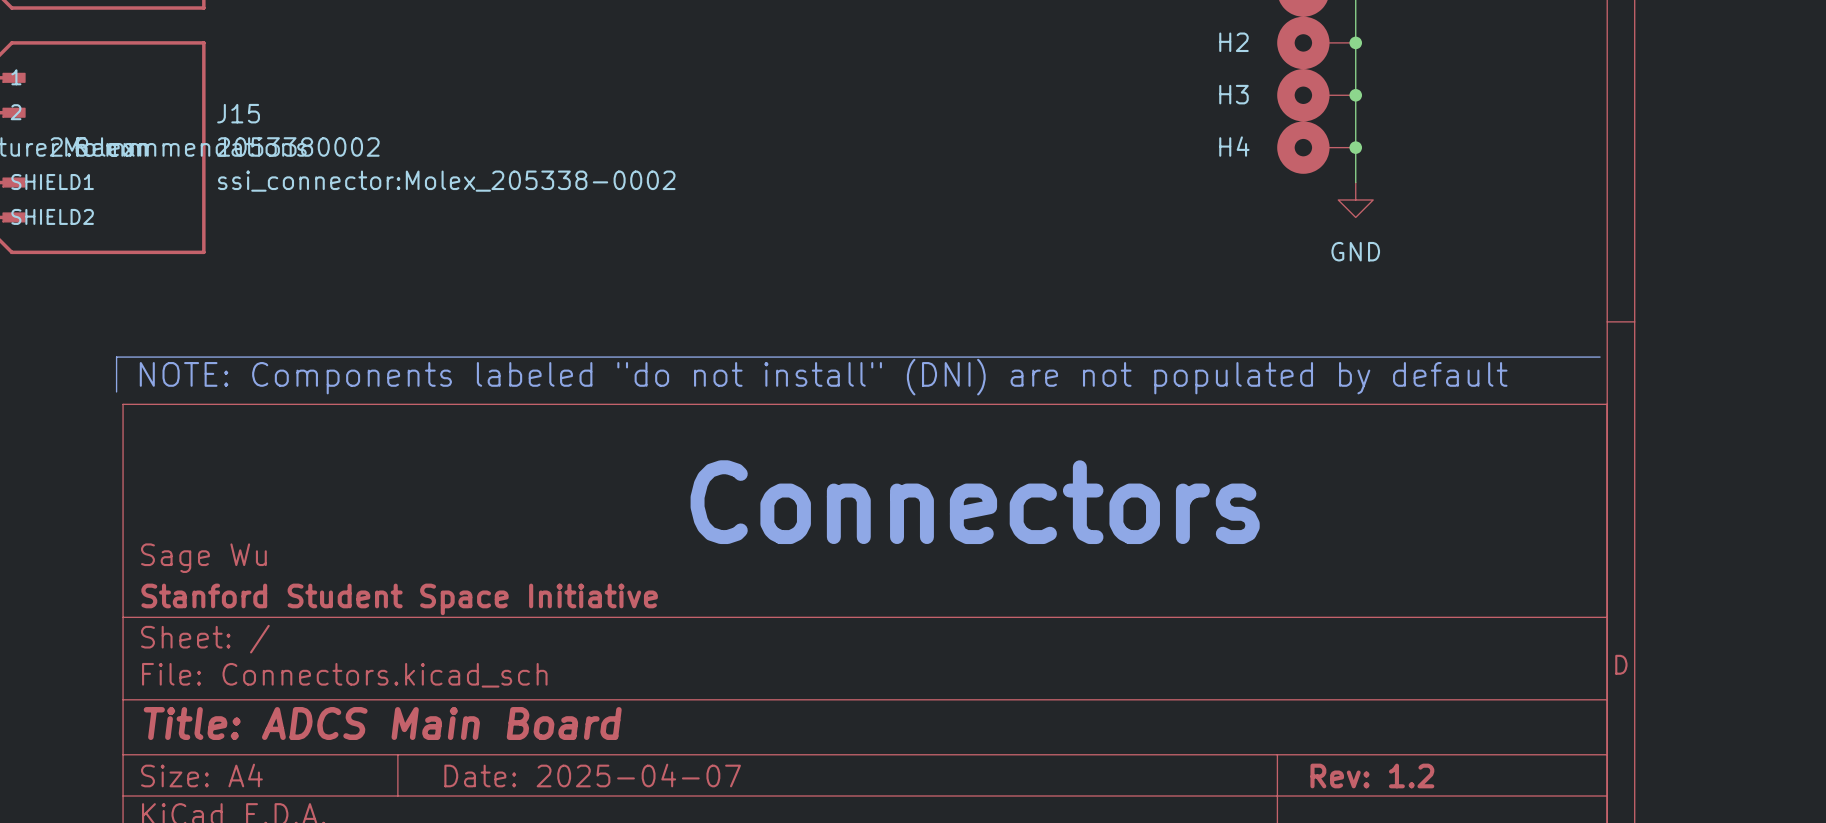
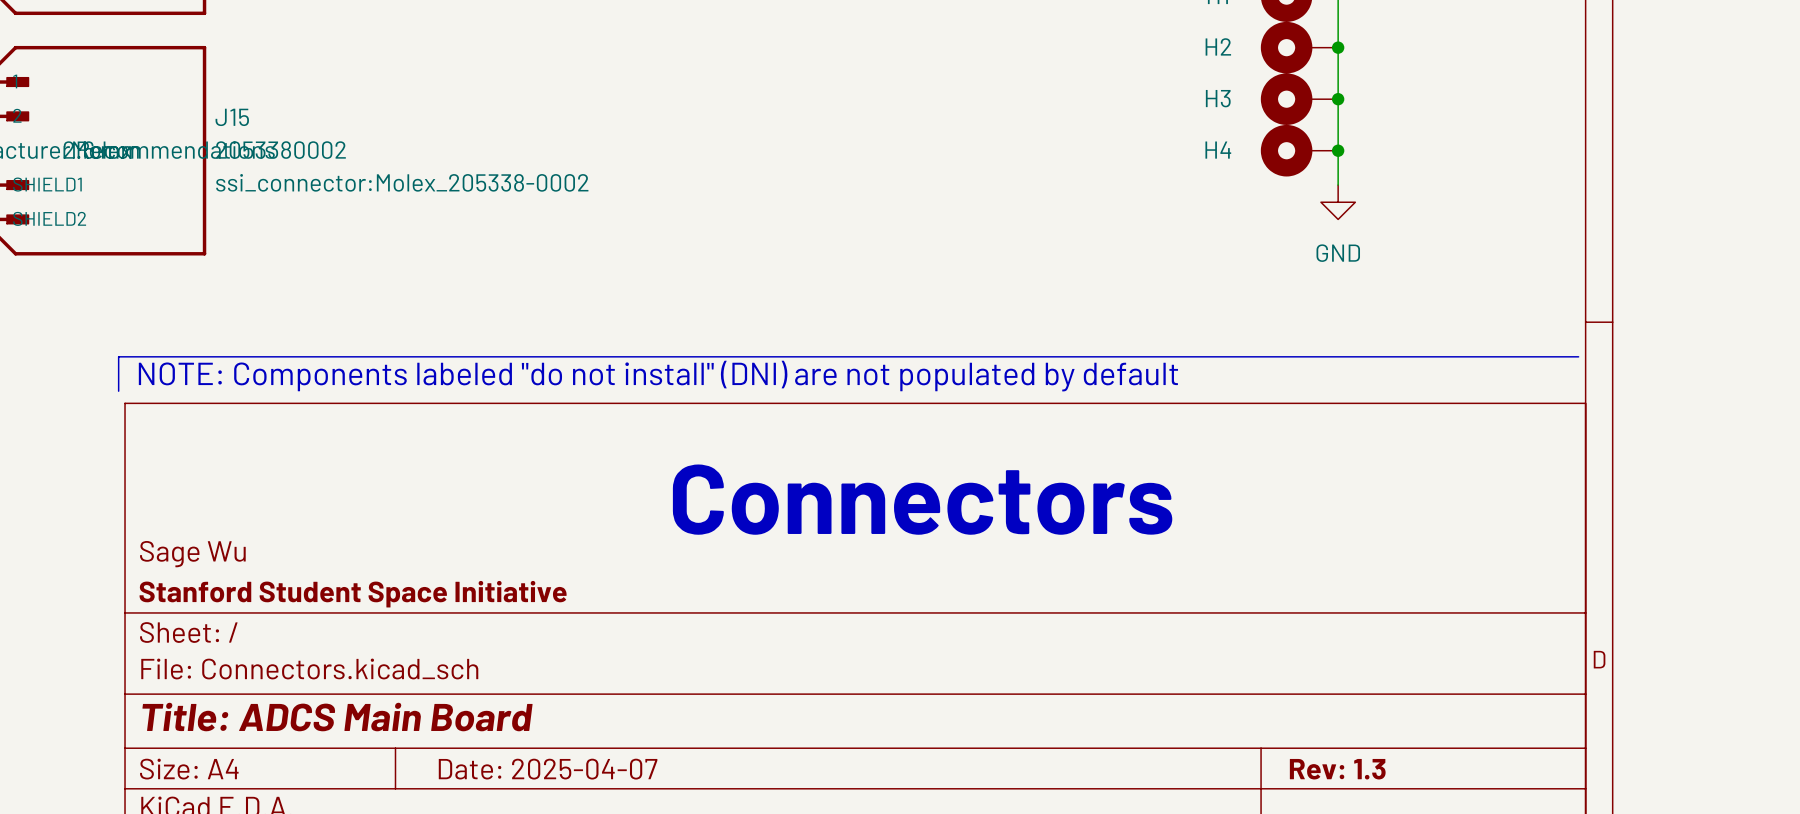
title block: Rev: 1.2 (1372, 775) -> Rev: 1.3 (1337, 769)

